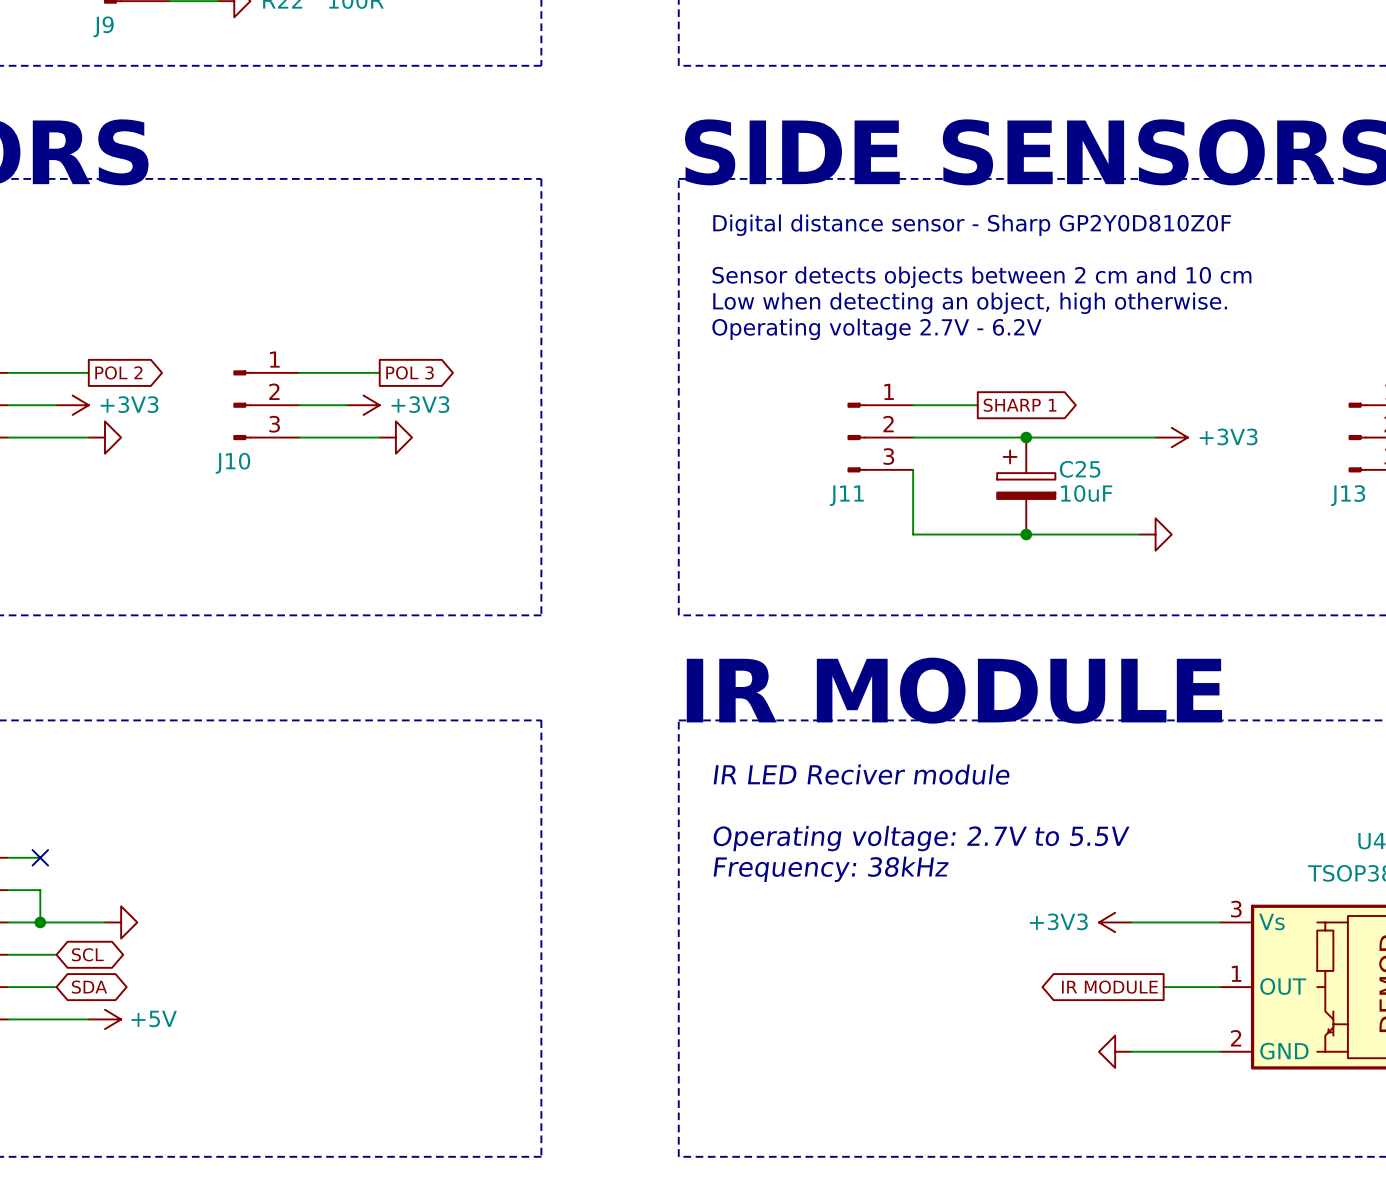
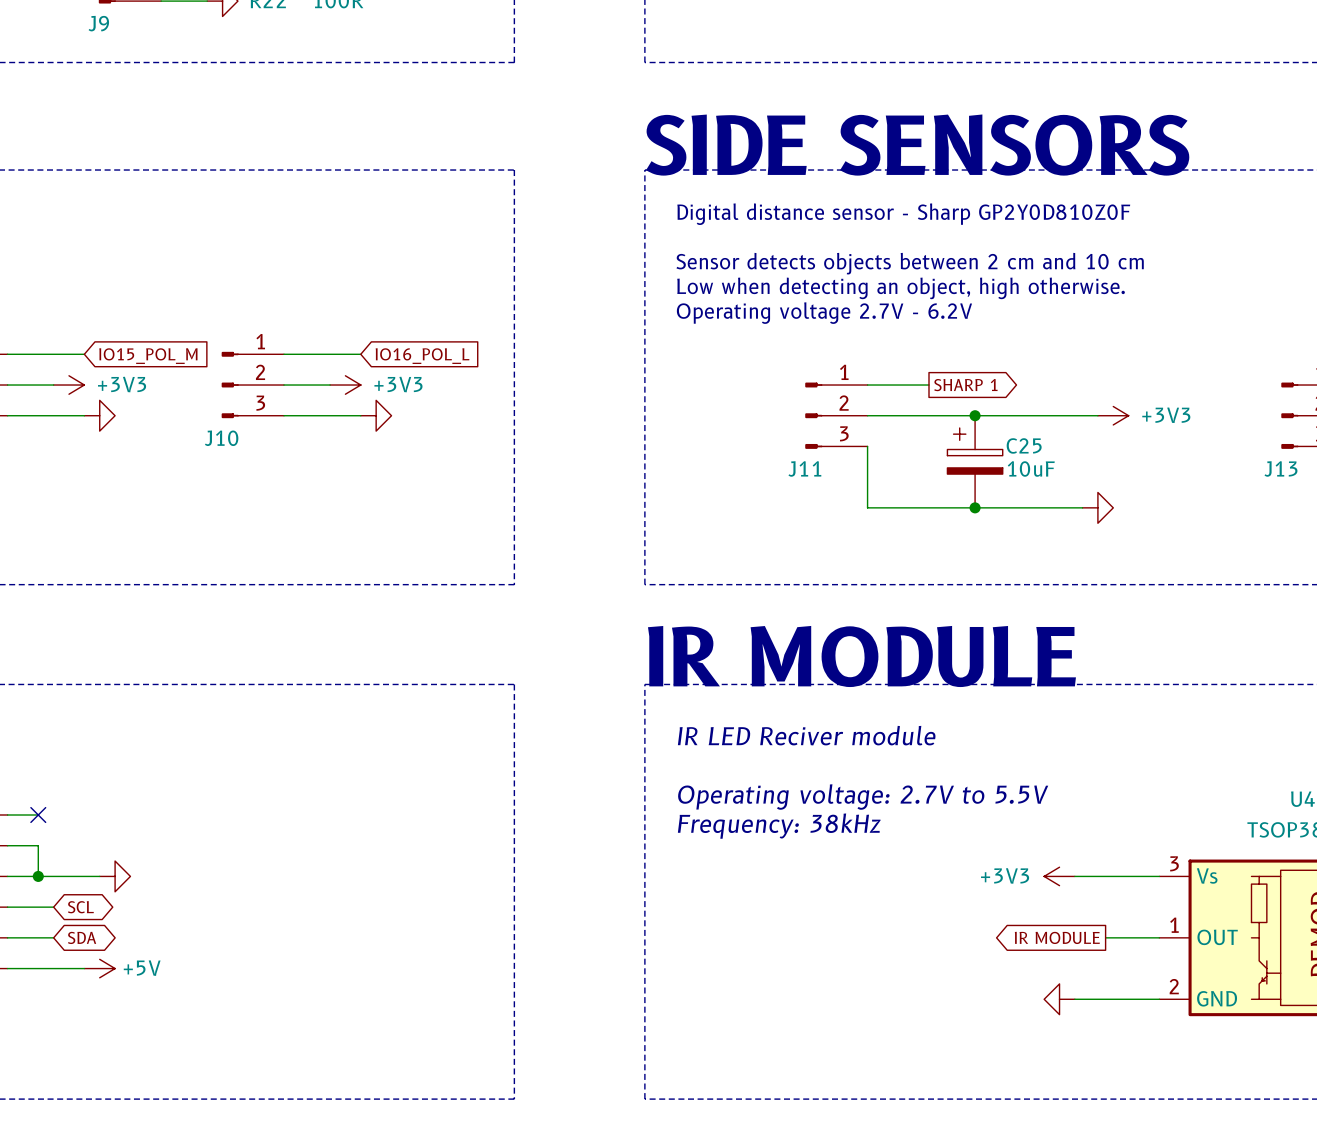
global label shape: output (118, 372) -> input (148, 356)
global label: POL 2 (118, 372) -> IO15_POL_M (148, 356)
global label shape: output (409, 372) -> input (422, 356)
global label: POL 3 (409, 372) -> IO16_POL_L (422, 356)

